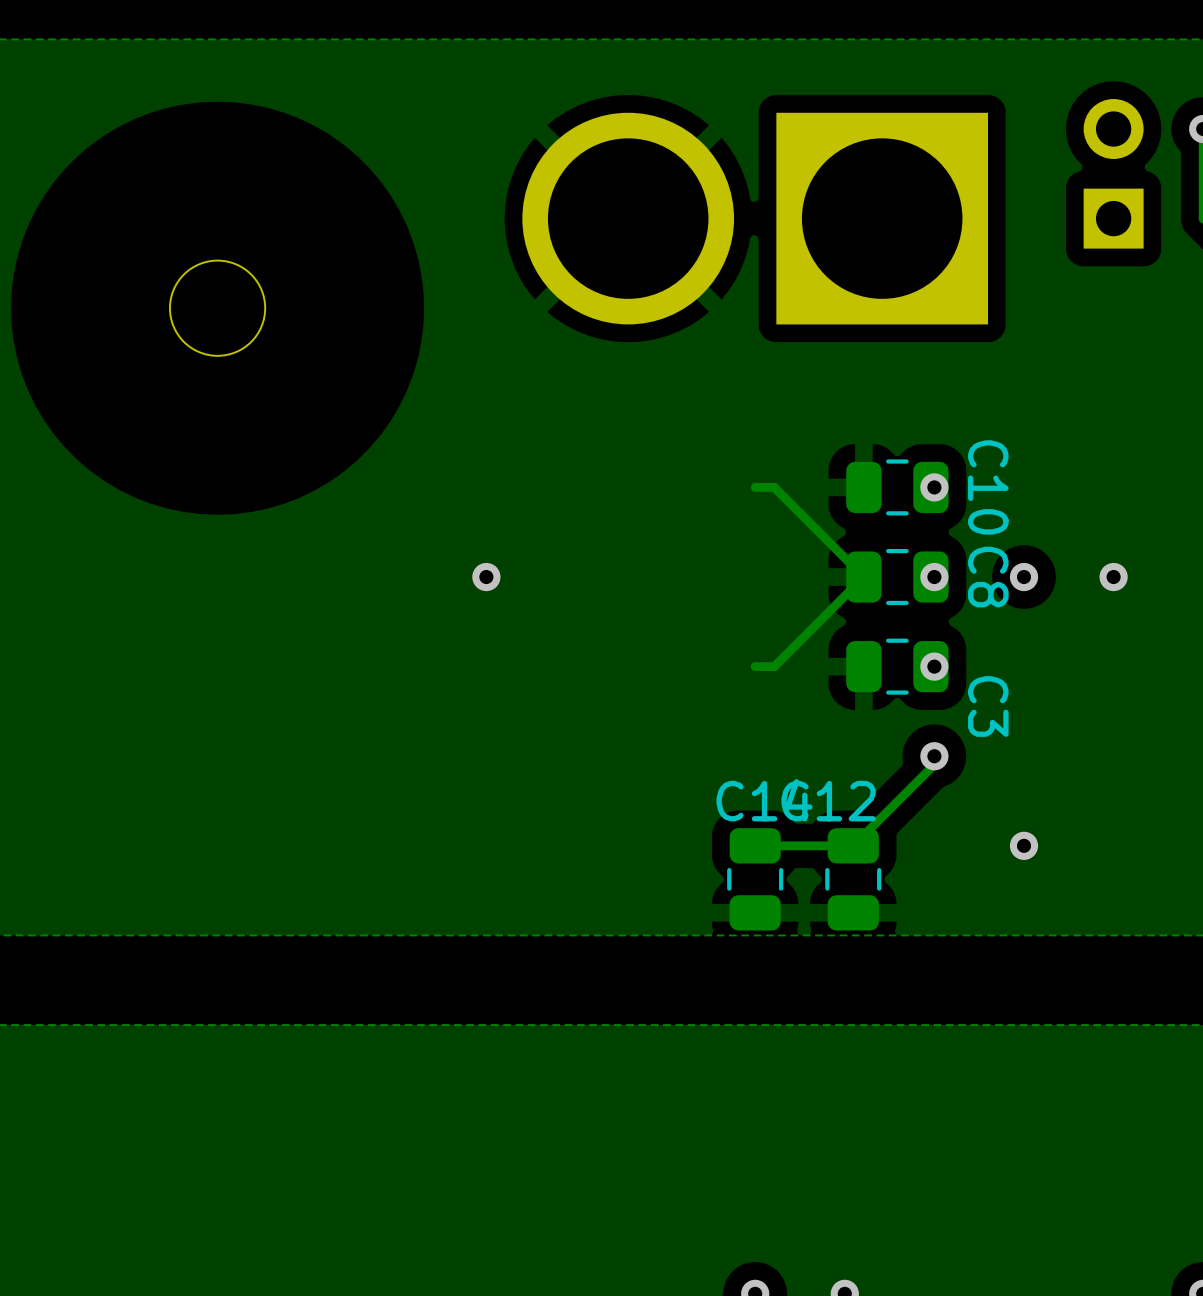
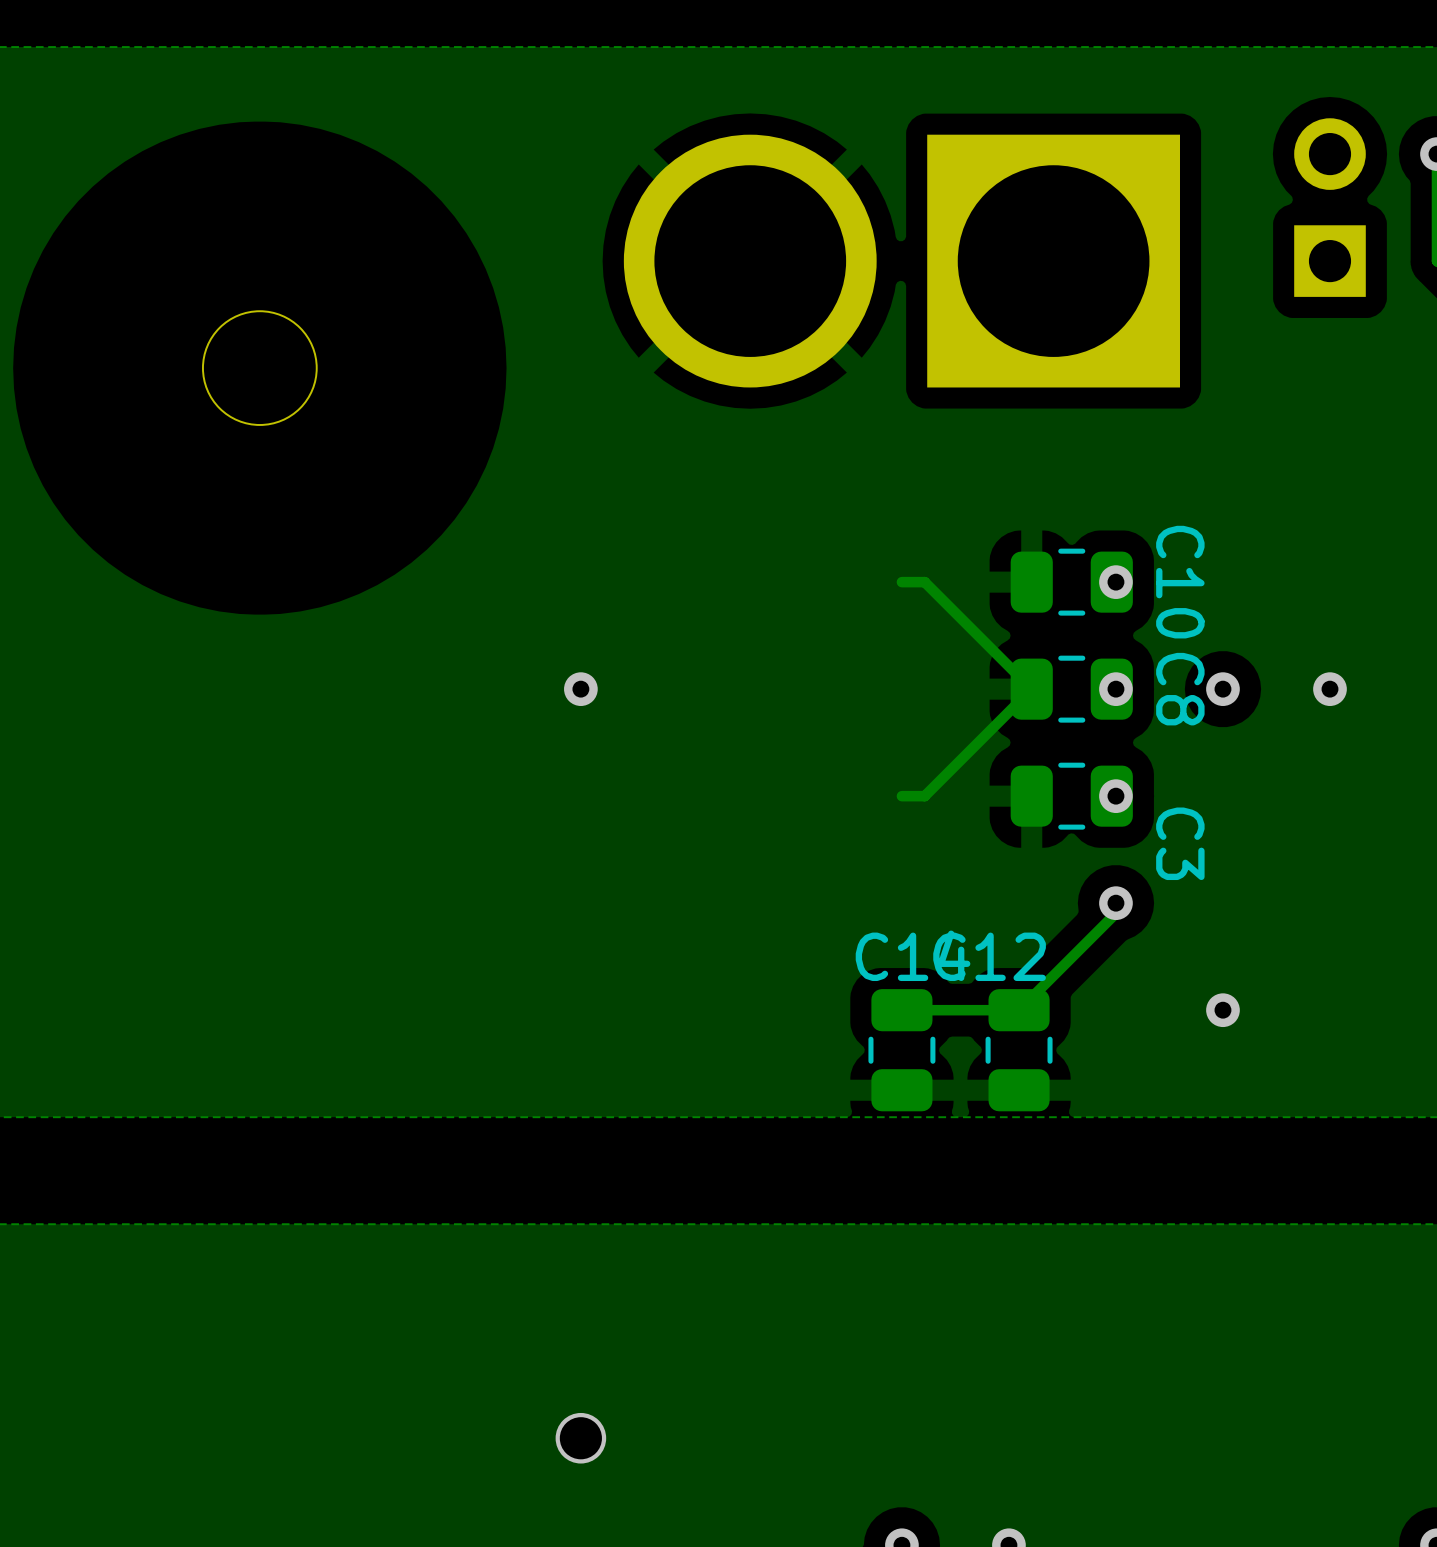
via: none -> (580, 1438)

